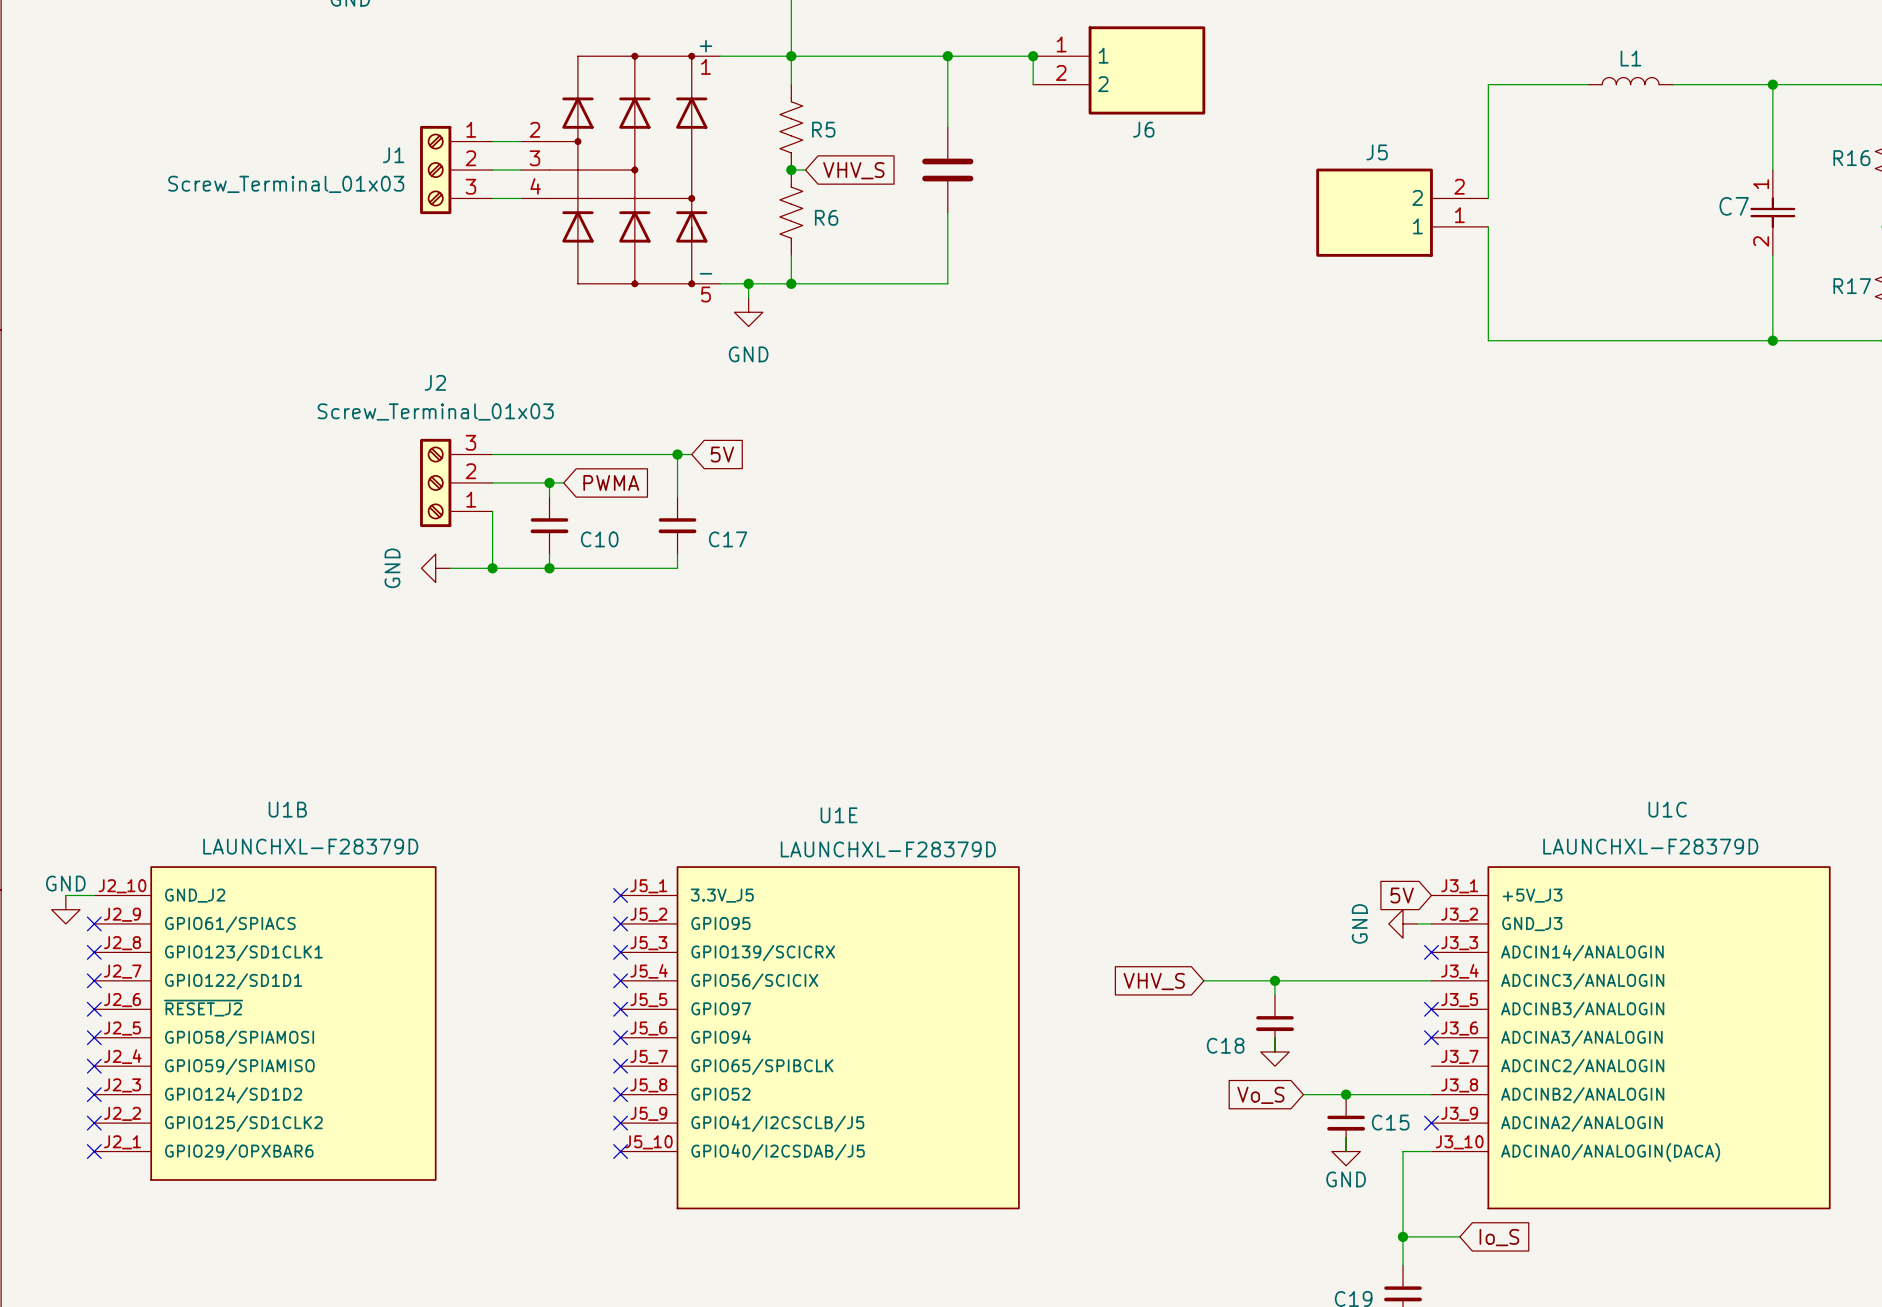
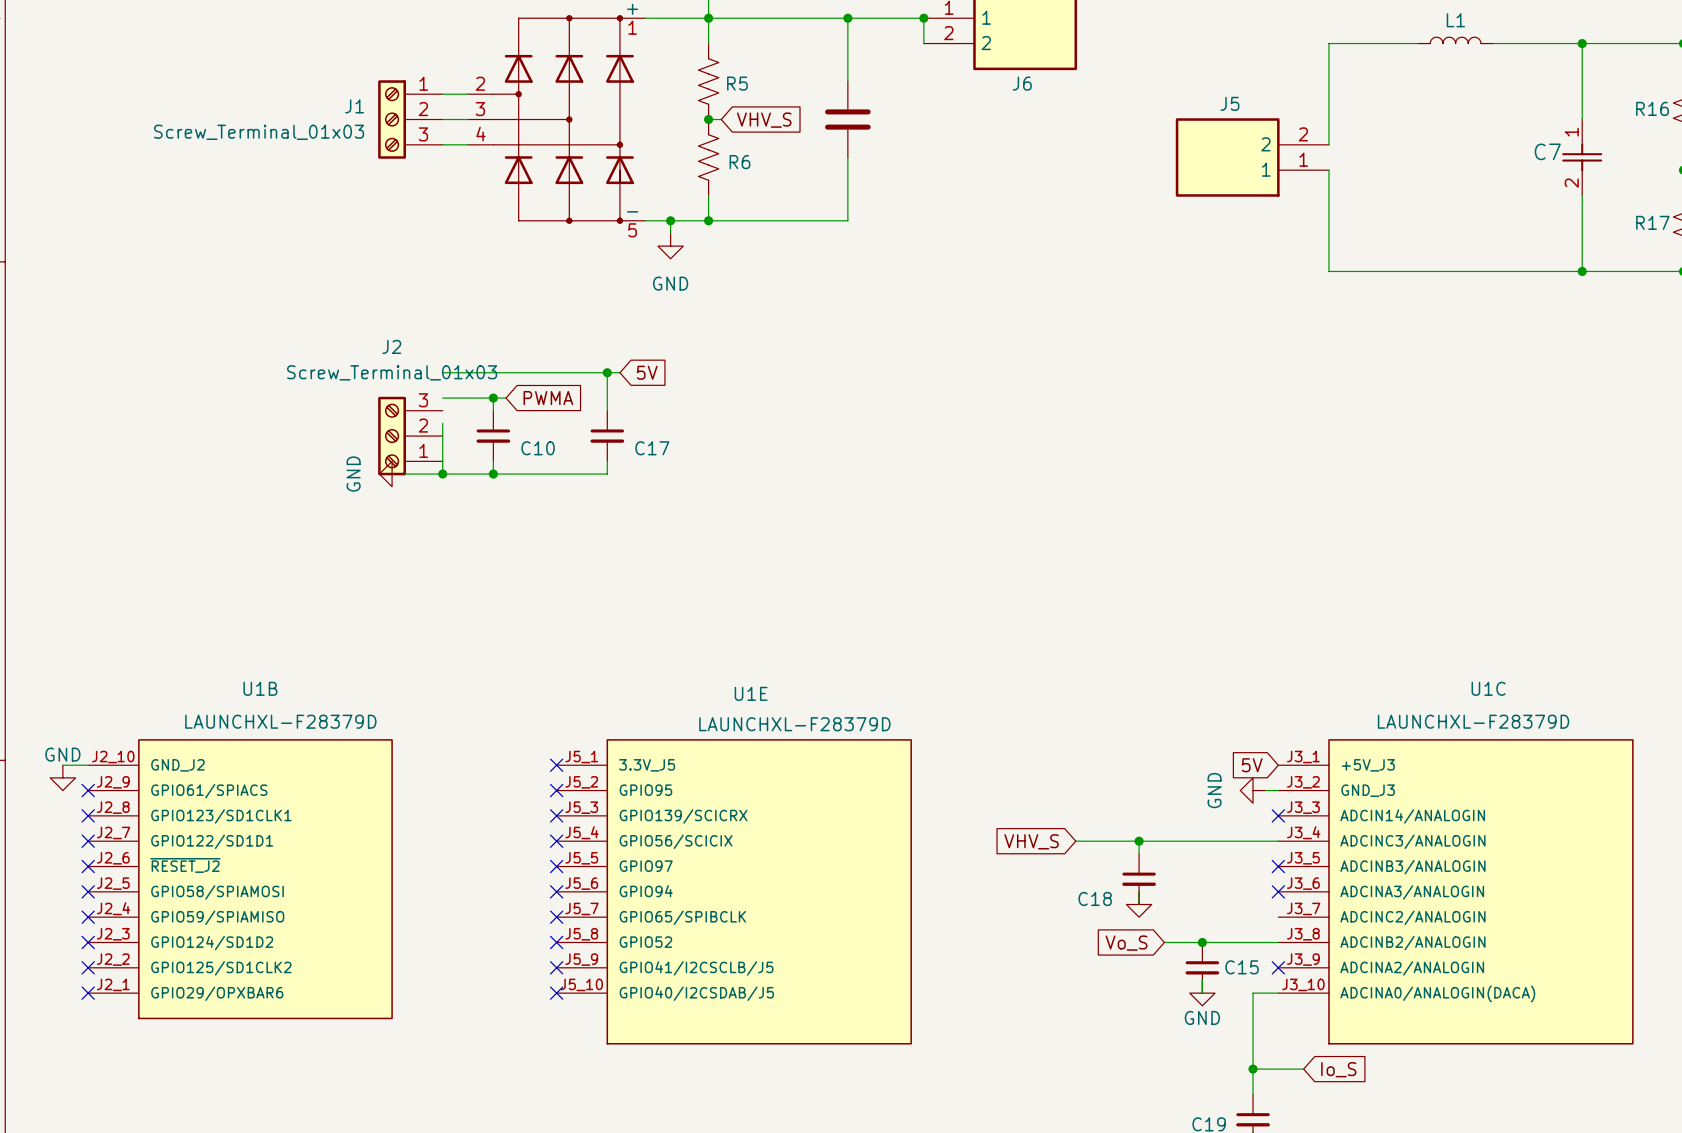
J2 position: (456, 482) -> (410, 436)

